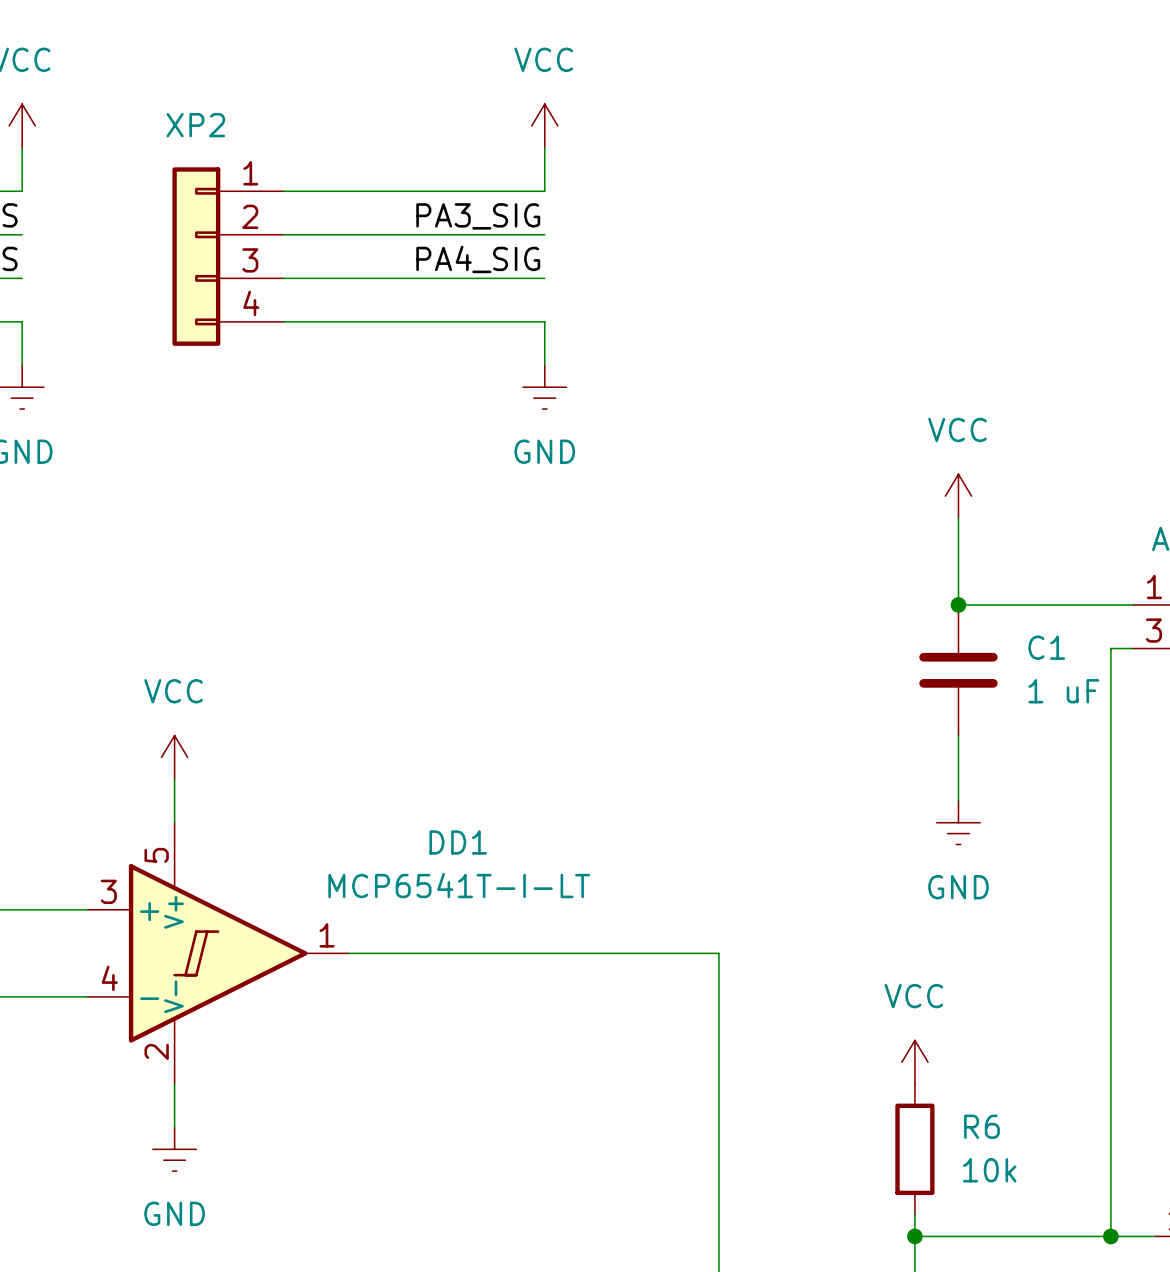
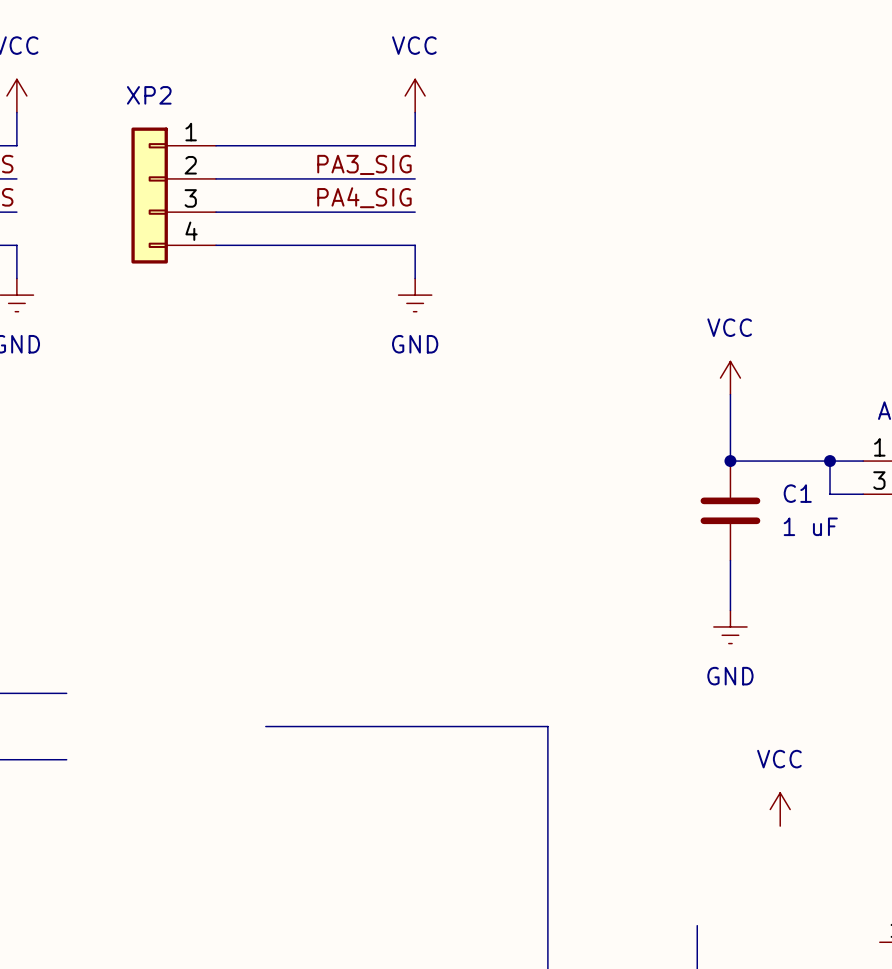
junction: none -> (830, 461)
wire: (1110, 648) (1110, 1236) -> (846, 494) (830, 494) (830, 461)
power symbol: VCC (174, 757) -> none
wire: (174, 779) (174, 822) -> none
DD1: MCP6541T-I-LT (218, 953) -> none
power symbol position: VCC (914, 1062) -> VCC (780, 809)
wire: (174, 1084) (174, 1127) -> none
power symbol: GND (174, 1149) -> none
R6: 10k (914, 1149) -> none
wire: (914, 1236) (1154, 1236) -> none
junction: (914, 1236) -> none
junction: (1110, 1236) -> none

